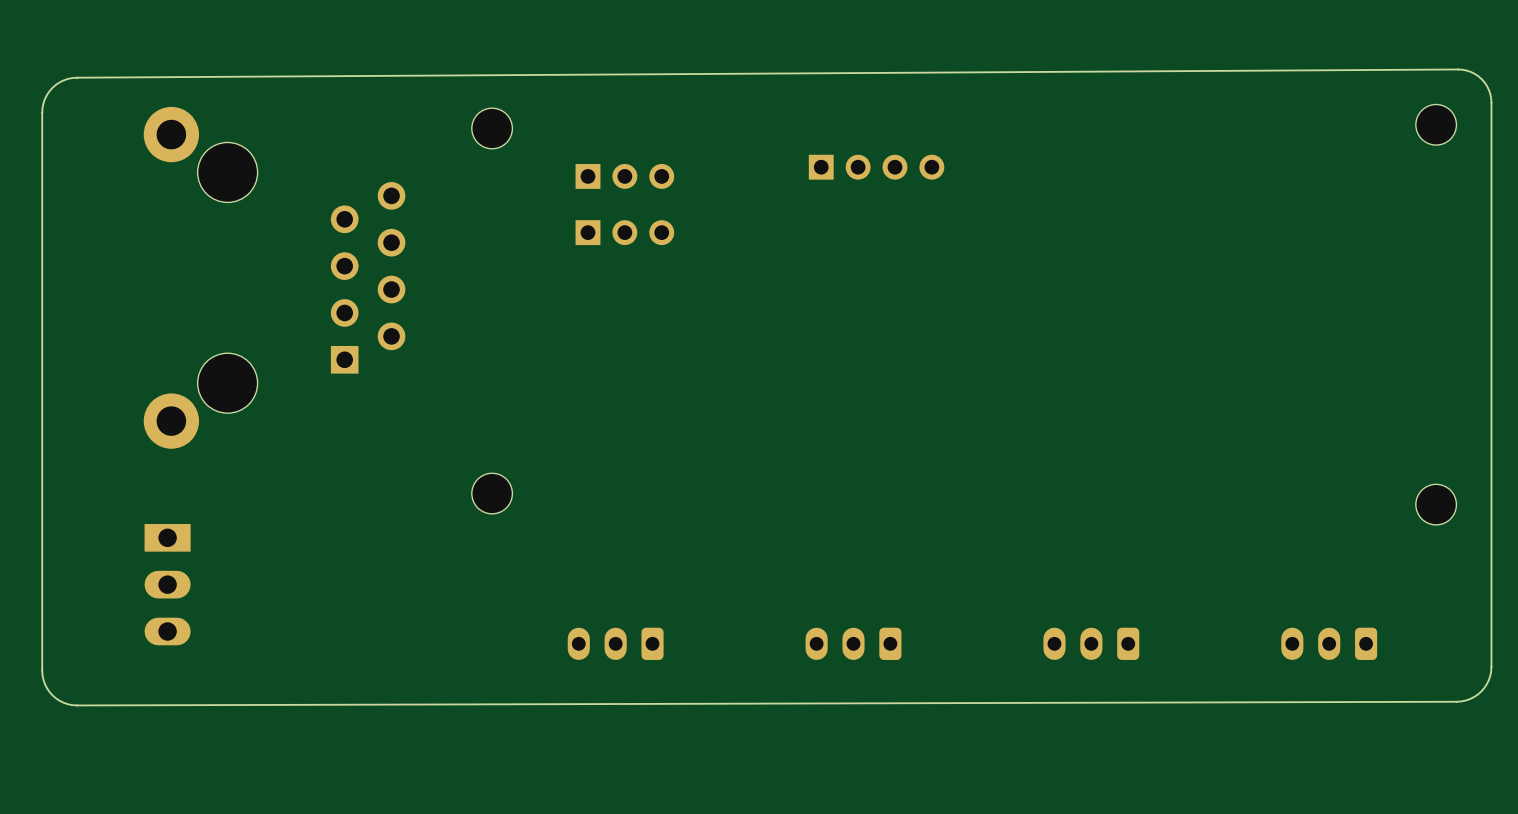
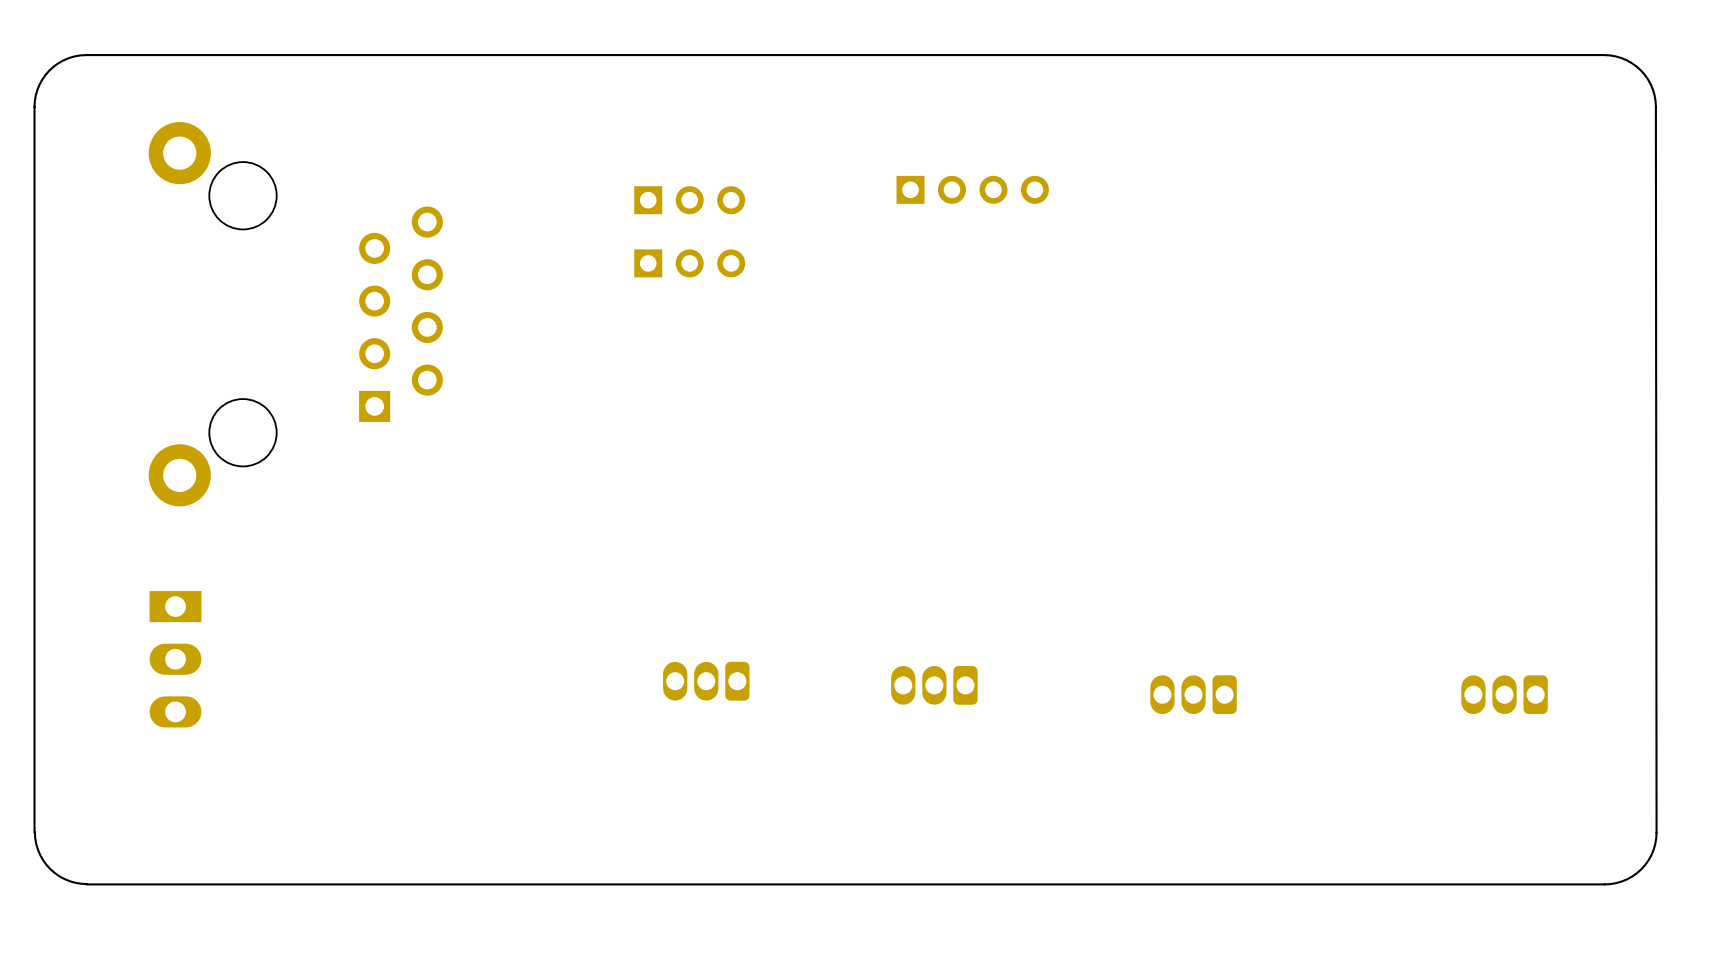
board edge: (42, 112) (44, 99) (52, 87) (63, 80) (77, 77) (1458, 69) (1470, 72) (1481, 79) (1488, 89) (1491, 102) (1491, 666) (1488, 680) (1484, 688) (1469, 699) (1456, 701) (77, 705) (63, 702) (52, 695) (44, 683) (42, 670) -> (34, 128) (34, 101) (42, 79) (54, 66) (63, 60) (86, 55) (1604, 55) (1621, 57) (1636, 66) (1650, 84) (1655, 101) (1656, 832) (1655, 844) (1648, 860) (1641, 869) (1627, 879) (1604, 884) (86, 884)
part: (1436, 124) -> none
part: (492, 128) -> none
part: (492, 493) -> none
part: (1436, 504) -> none
part: none -> (706, 681)
part: none -> (934, 685)
part: none -> (1193, 694)
part: none -> (1504, 694)
part: (615, 643) -> none
part: (853, 643) -> none
part: (1091, 643) -> none
part: (1329, 643) -> none
board edge: none -> (34, 755) (34, 832)
board edge: none -> (34, 832) (37, 849) (50, 868) (64, 878) (86, 884)

